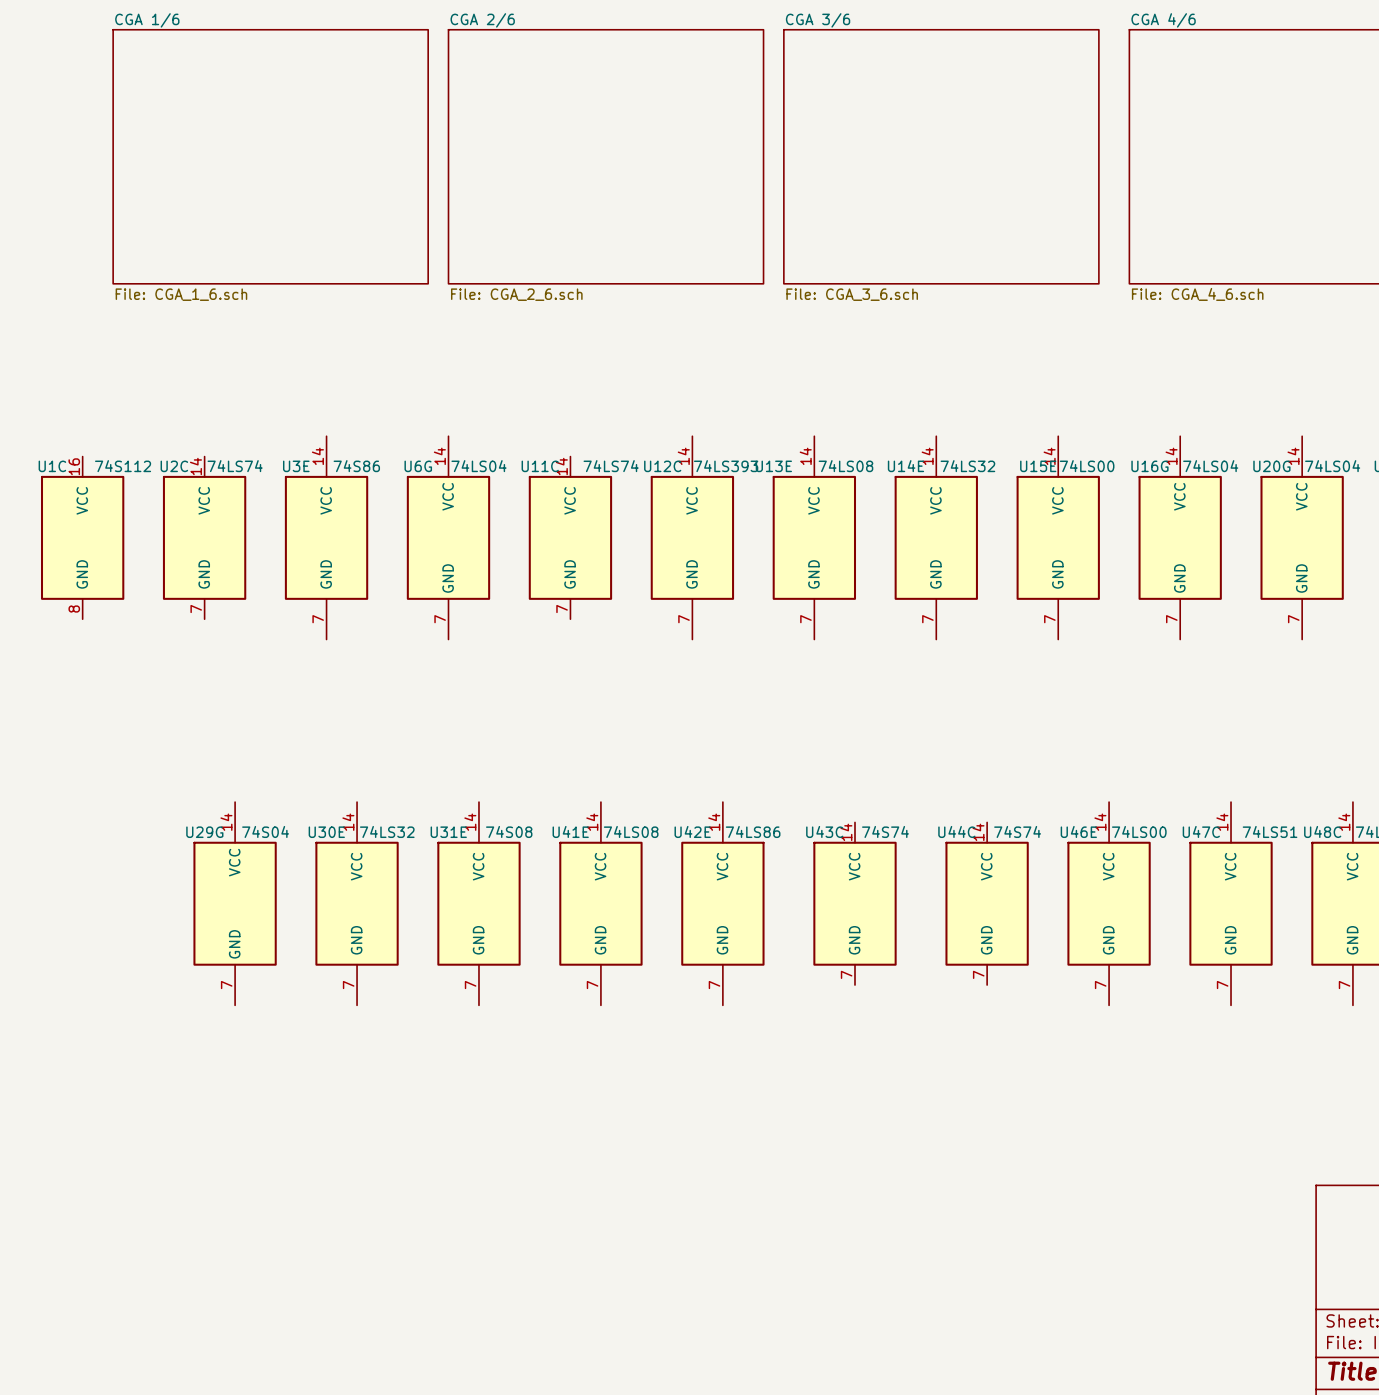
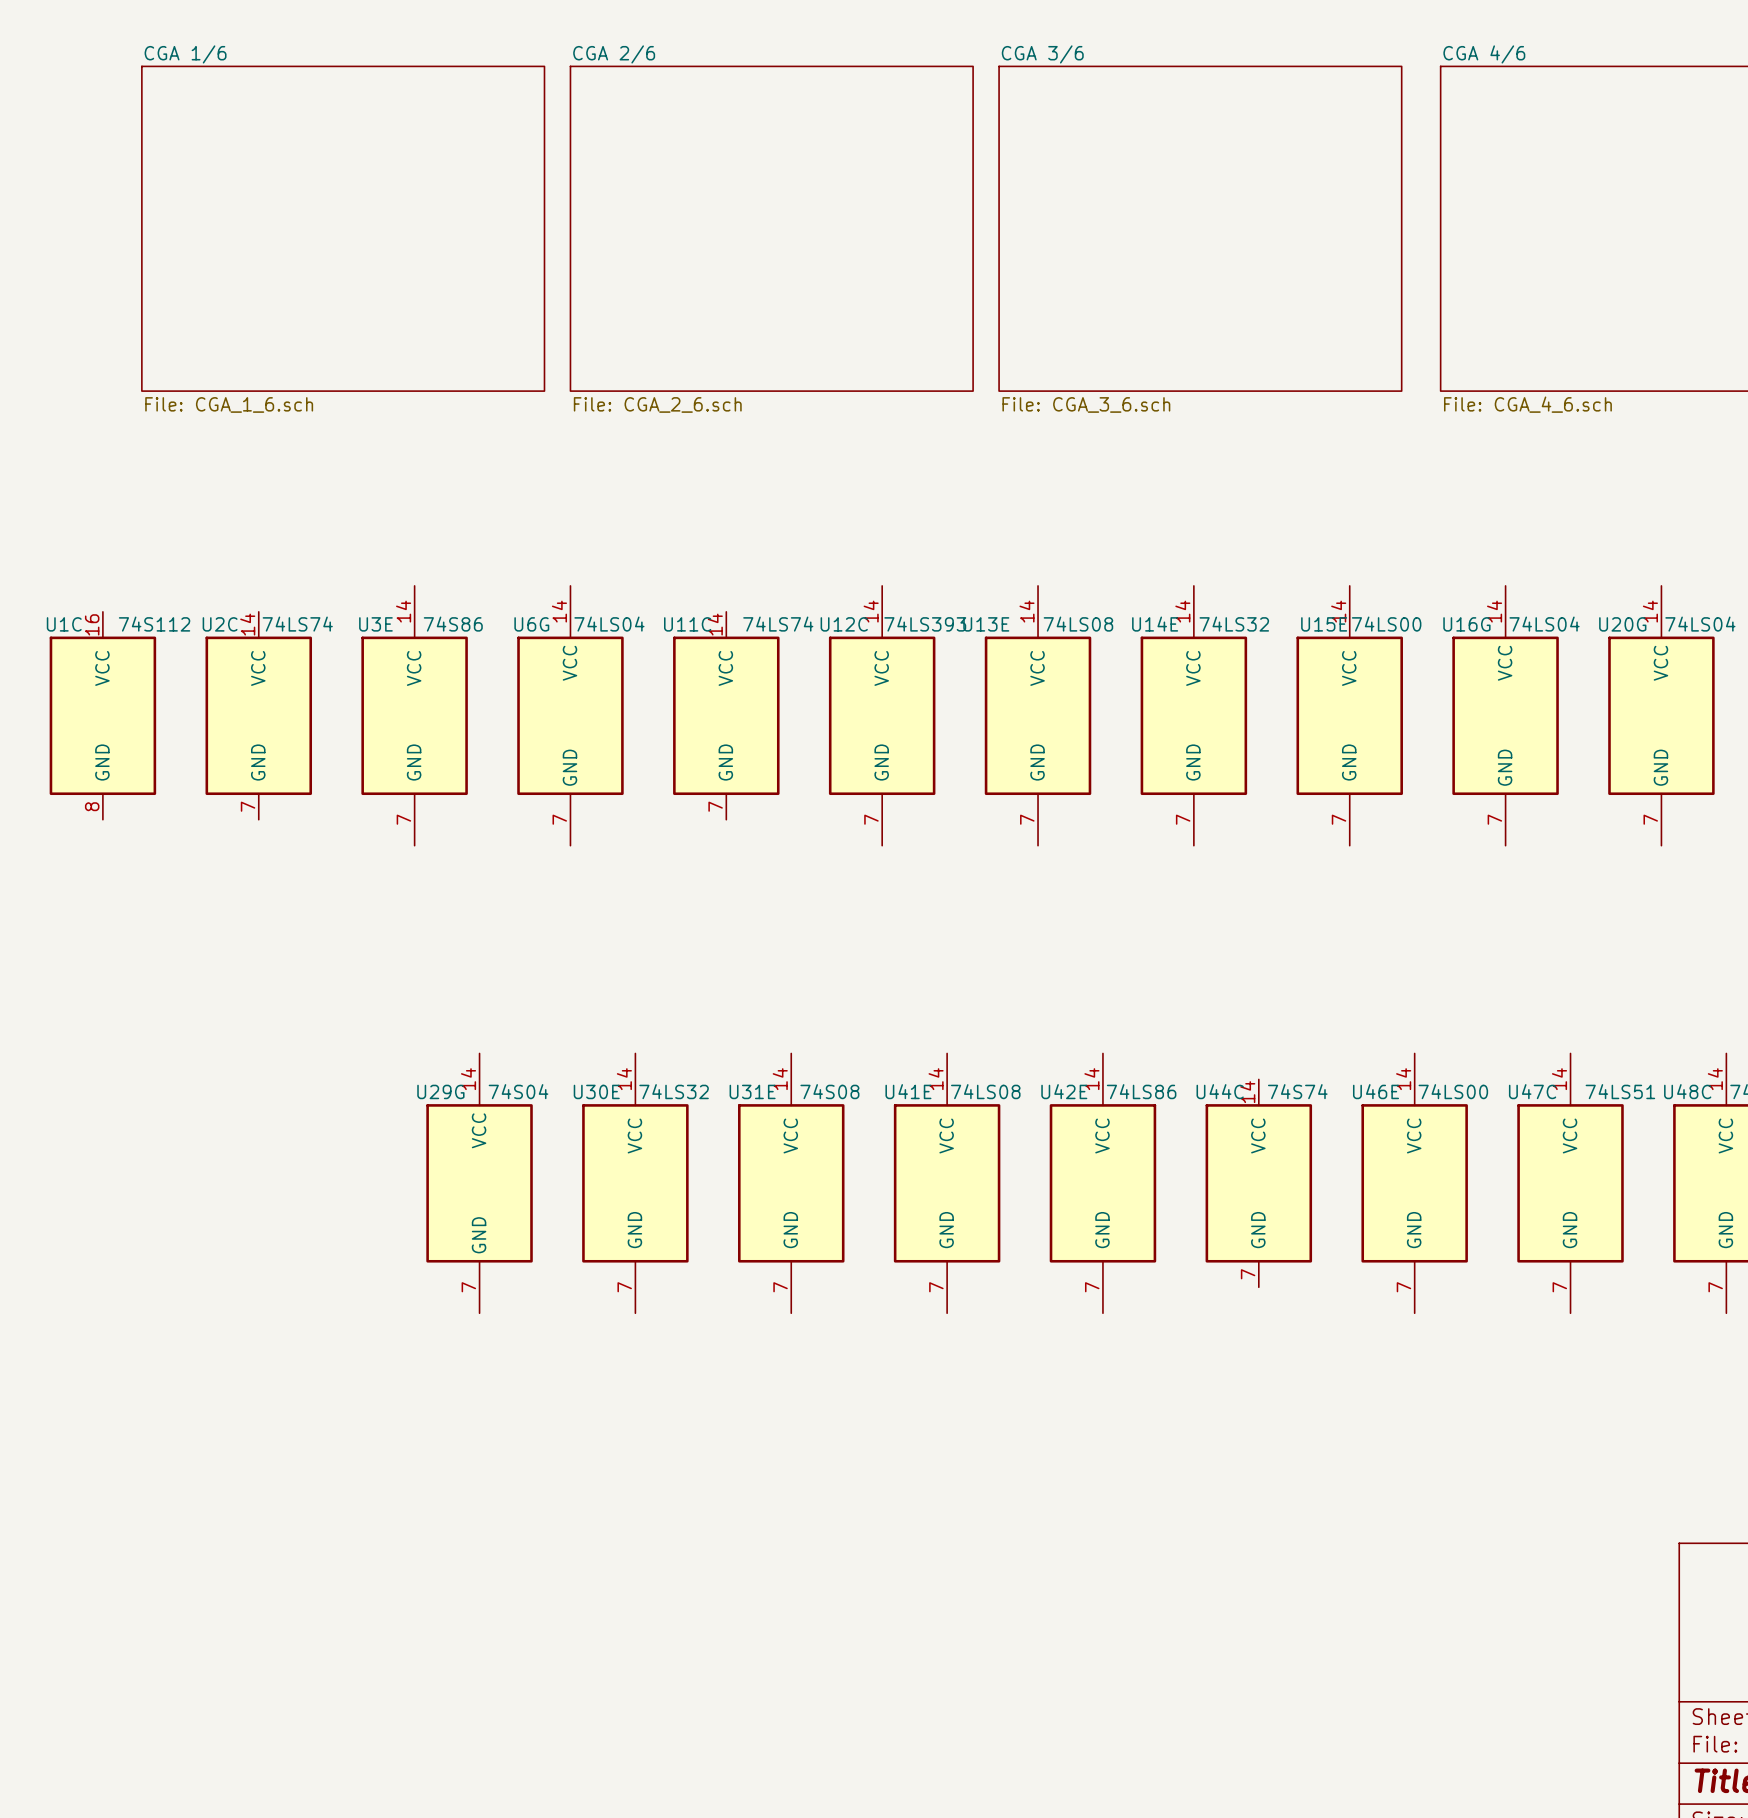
U29G position: (235, 903) -> (479, 1183)
U30E position: (357, 903) -> (635, 1183)
U31E position: (478, 903) -> (791, 1183)
U41E position: (600, 903) -> (947, 1183)
U42E position: (722, 903) -> (1102, 1183)
U43C: 74S74 (854, 903) -> none

